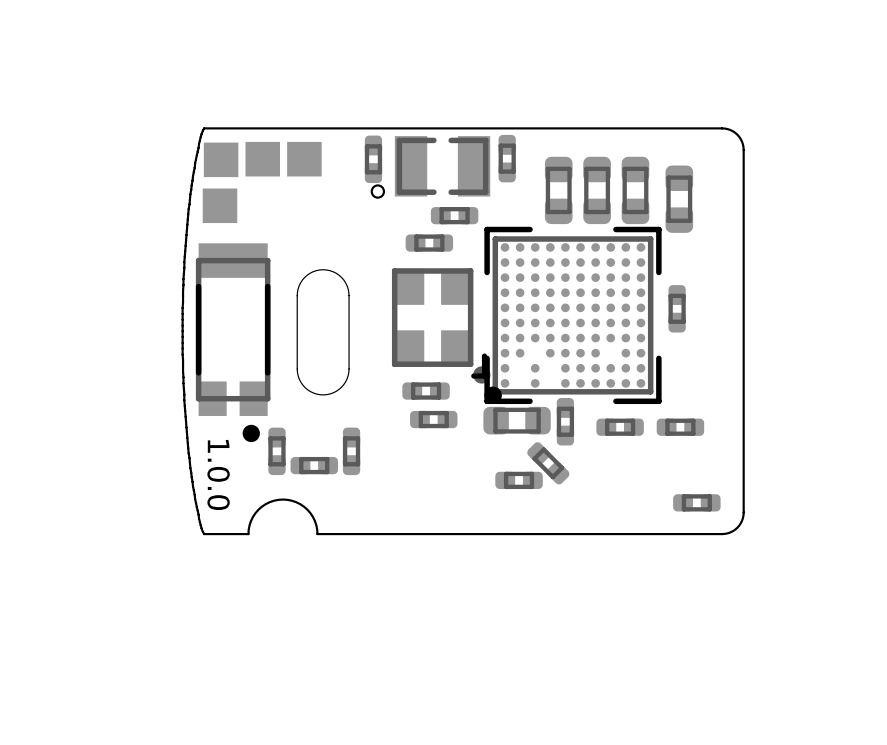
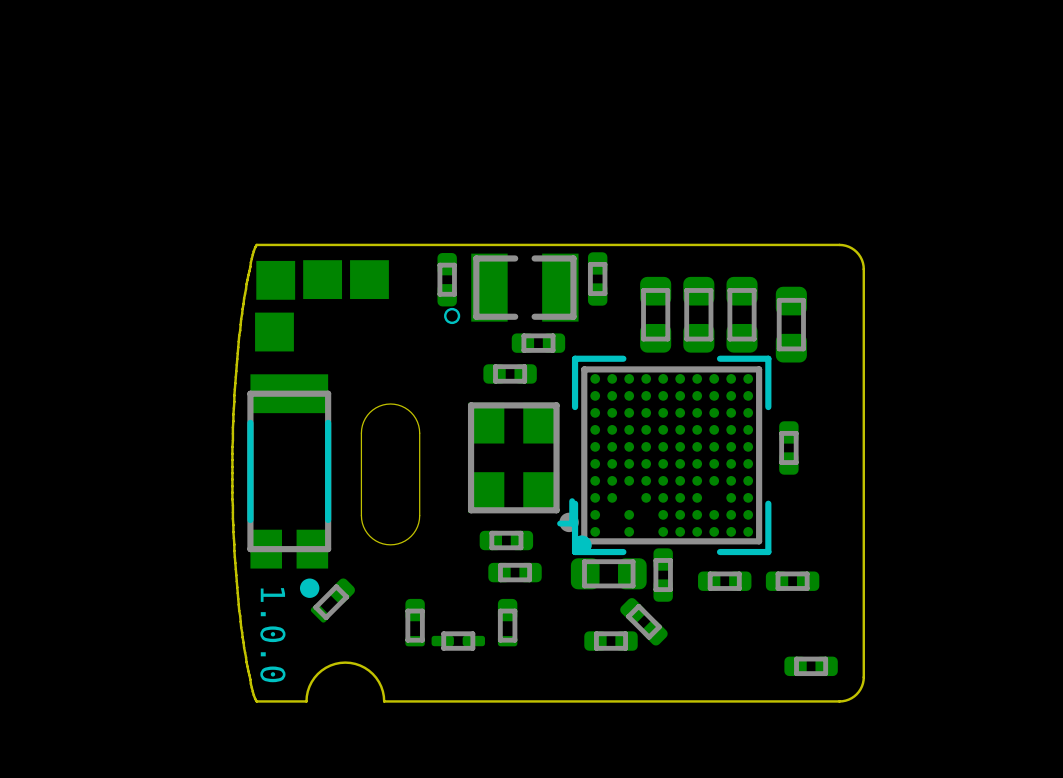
part footprint: [268, 427, 286, 476] -> [310, 578, 355, 623]
part footprint: [342, 427, 361, 476] -> [405, 598, 425, 647]
part: none -> (507, 622)
part: (314, 465) -> none
part: none -> (458, 641)

